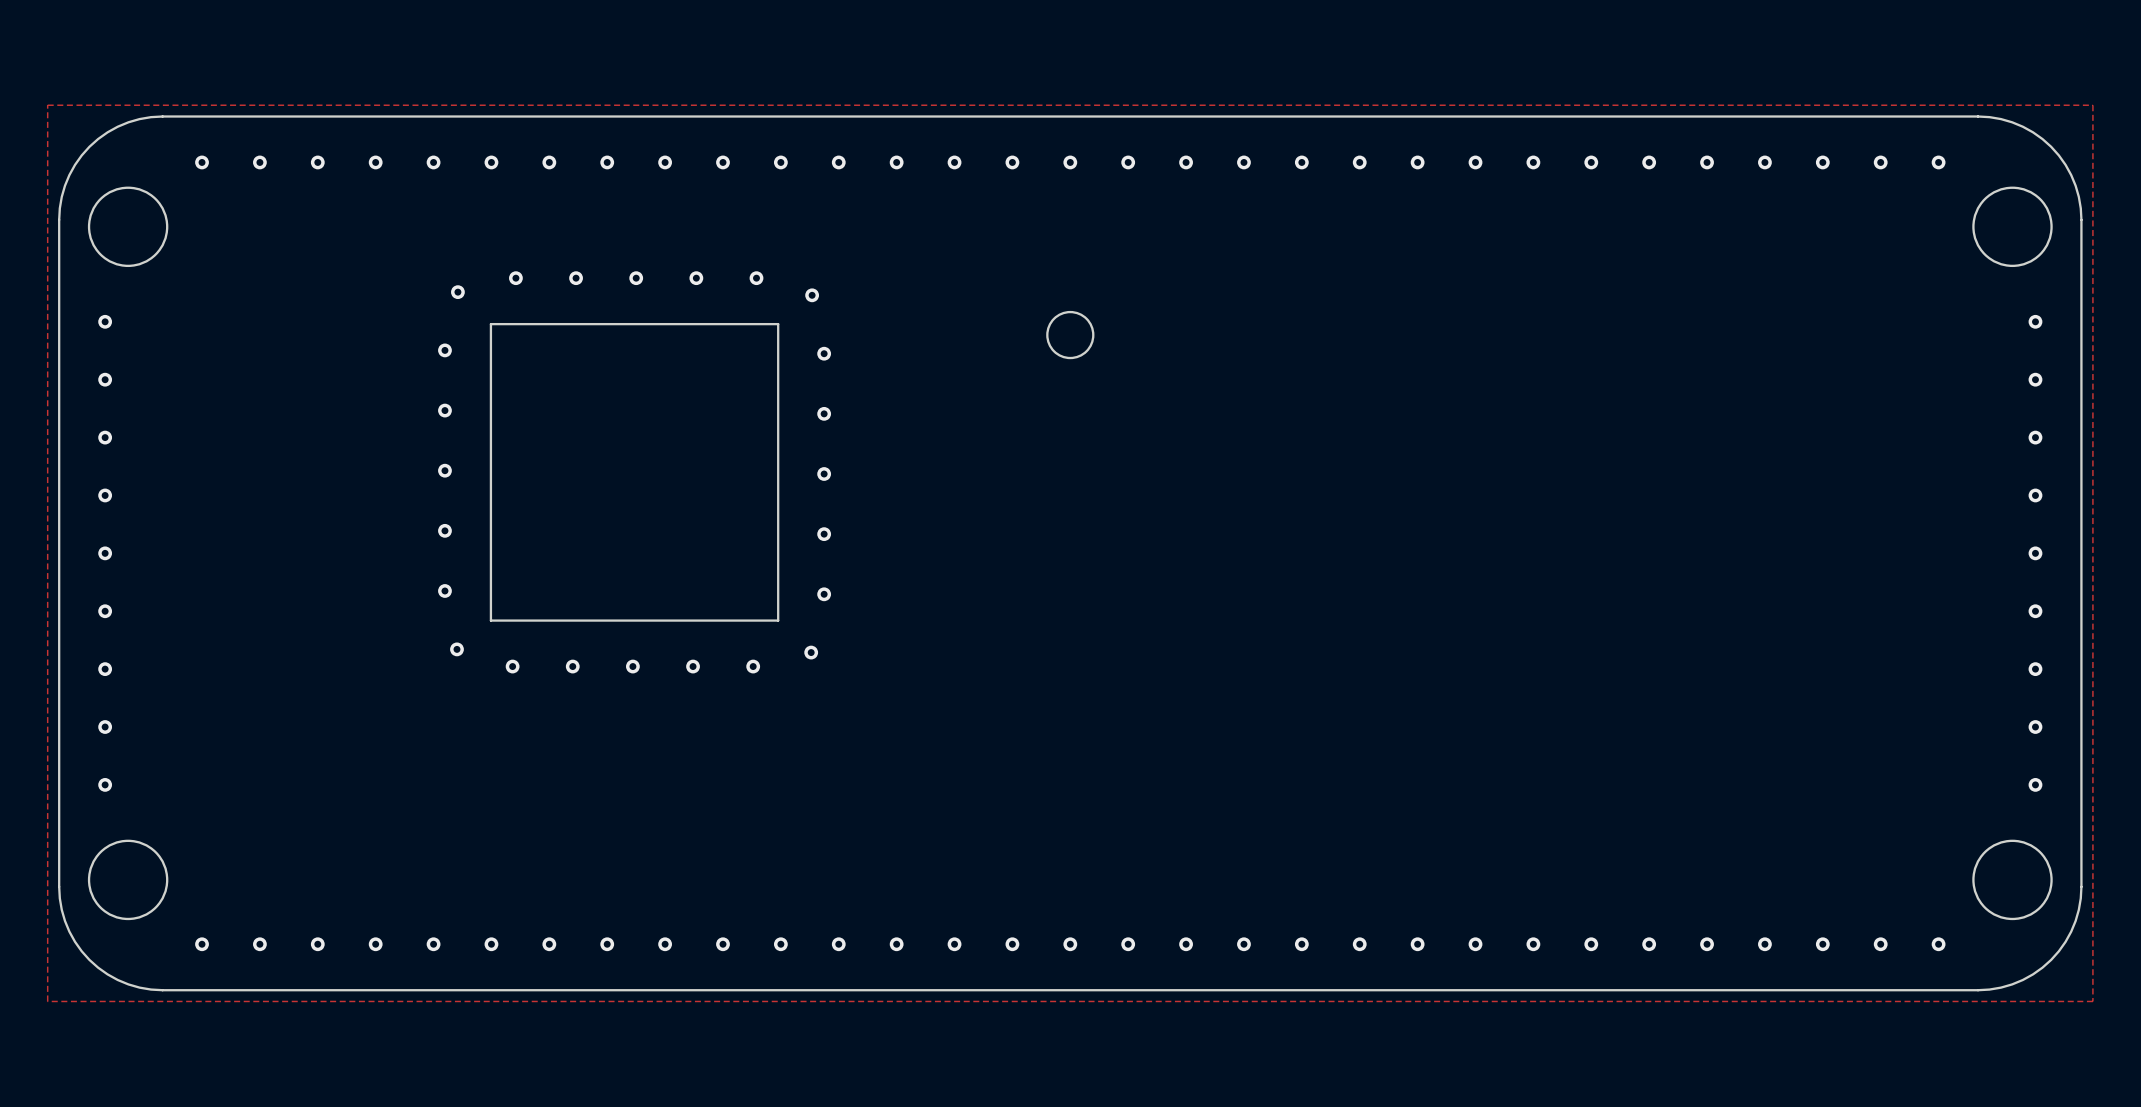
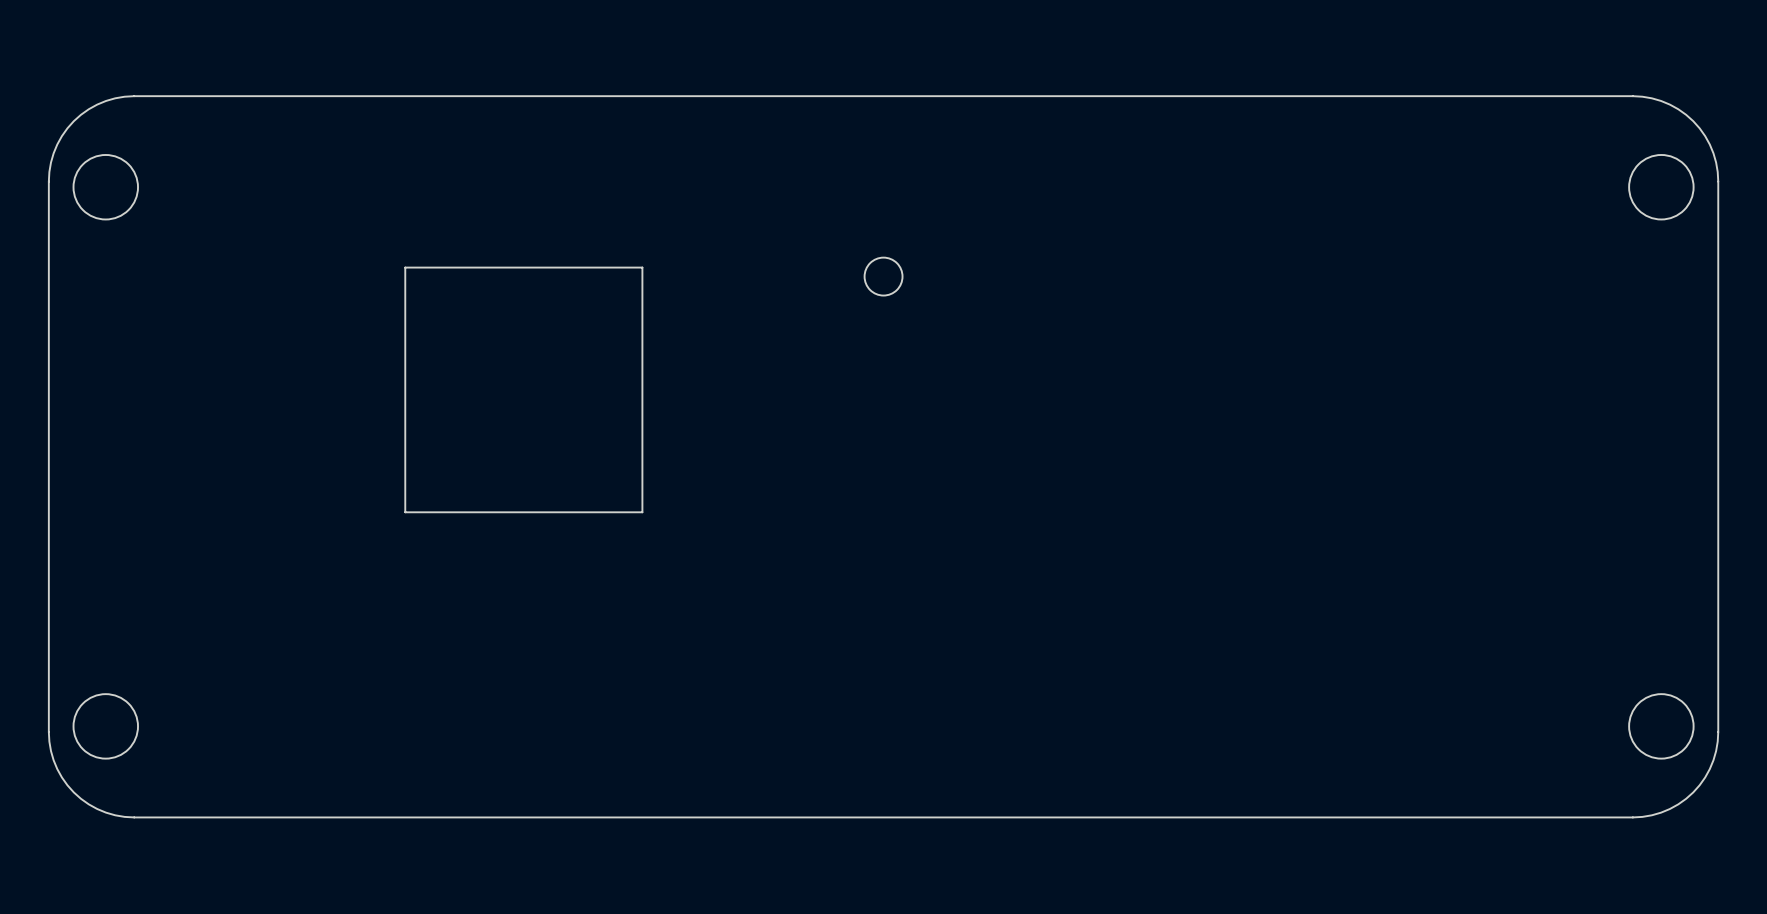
zone outline: (47, 105) (47, 1001) (2092, 1001) (2092, 105) (47, 105) -> none
via: (202, 162) -> none
via: (259, 162) -> none
via: (317, 162) -> none
via: (375, 162) -> none
via: (433, 162) -> none
via: (491, 162) -> none
via: (549, 162) -> none
via: (607, 162) -> none
via: (665, 162) -> none
via: (722, 162) -> none
via: (780, 162) -> none
via: (838, 162) -> none
via: (896, 162) -> none
via: (954, 162) -> none
via: (1012, 162) -> none
via: (1070, 162) -> none
via: (1128, 162) -> none
via: (1186, 162) -> none
via: (1243, 162) -> none
via: (1301, 162) -> none
via: (1359, 162) -> none
via: (1417, 162) -> none
via: (1475, 162) -> none
via: (1533, 162) -> none
via: (1591, 162) -> none
via: (1649, 162) -> none
via: (1707, 162) -> none
via: (1764, 162) -> none
via: (1822, 162) -> none
via: (1880, 162) -> none
via: (1938, 162) -> none
via: (515, 278) -> none
via: (576, 278) -> none
via: (636, 278) -> none
via: (696, 278) -> none
via: (756, 278) -> none
via: (457, 292) -> none
via: (812, 295) -> none
via: (105, 321) -> none
via: (2035, 321) -> none
via: (444, 350) -> none
via: (824, 353) -> none
via: (105, 379) -> none
via: (2035, 379) -> none
via: (444, 410) -> none
via: (824, 413) -> none
via: (105, 437) -> none
via: (2035, 437) -> none
via: (444, 470) -> none
via: (824, 474) -> none
via: (105, 495) -> none
via: (2035, 495) -> none
via: (444, 530) -> none
via: (824, 534) -> none
via: (105, 553) -> none
via: (2035, 553) -> none
via: (444, 590) -> none
via: (824, 594) -> none
via: (105, 611) -> none
via: (2035, 611) -> none
via: (456, 649) -> none
via: (811, 652) -> none
via: (512, 666) -> none
via: (572, 666) -> none
via: (632, 666) -> none
via: (693, 666) -> none
via: (753, 666) -> none
via: (105, 669) -> none
via: (2035, 669) -> none
via: (105, 727) -> none
via: (2035, 727) -> none
via: (105, 784) -> none
via: (2035, 784) -> none
via: (202, 944) -> none
via: (259, 944) -> none
via: (317, 944) -> none
via: (375, 944) -> none
via: (433, 944) -> none
via: (491, 944) -> none
via: (549, 944) -> none
via: (607, 944) -> none
via: (665, 944) -> none
via: (722, 944) -> none
via: (780, 944) -> none
via: (838, 944) -> none
via: (896, 944) -> none
via: (954, 944) -> none
via: (1012, 944) -> none
via: (1070, 944) -> none
via: (1128, 944) -> none
via: (1186, 944) -> none
via: (1243, 944) -> none
via: (1301, 944) -> none
via: (1359, 944) -> none
via: (1417, 944) -> none
via: (1475, 944) -> none
via: (1533, 944) -> none
via: (1591, 944) -> none
via: (1649, 944) -> none
via: (1707, 944) -> none
via: (1764, 944) -> none
via: (1822, 944) -> none
via: (1880, 944) -> none
via: (1938, 944) -> none

